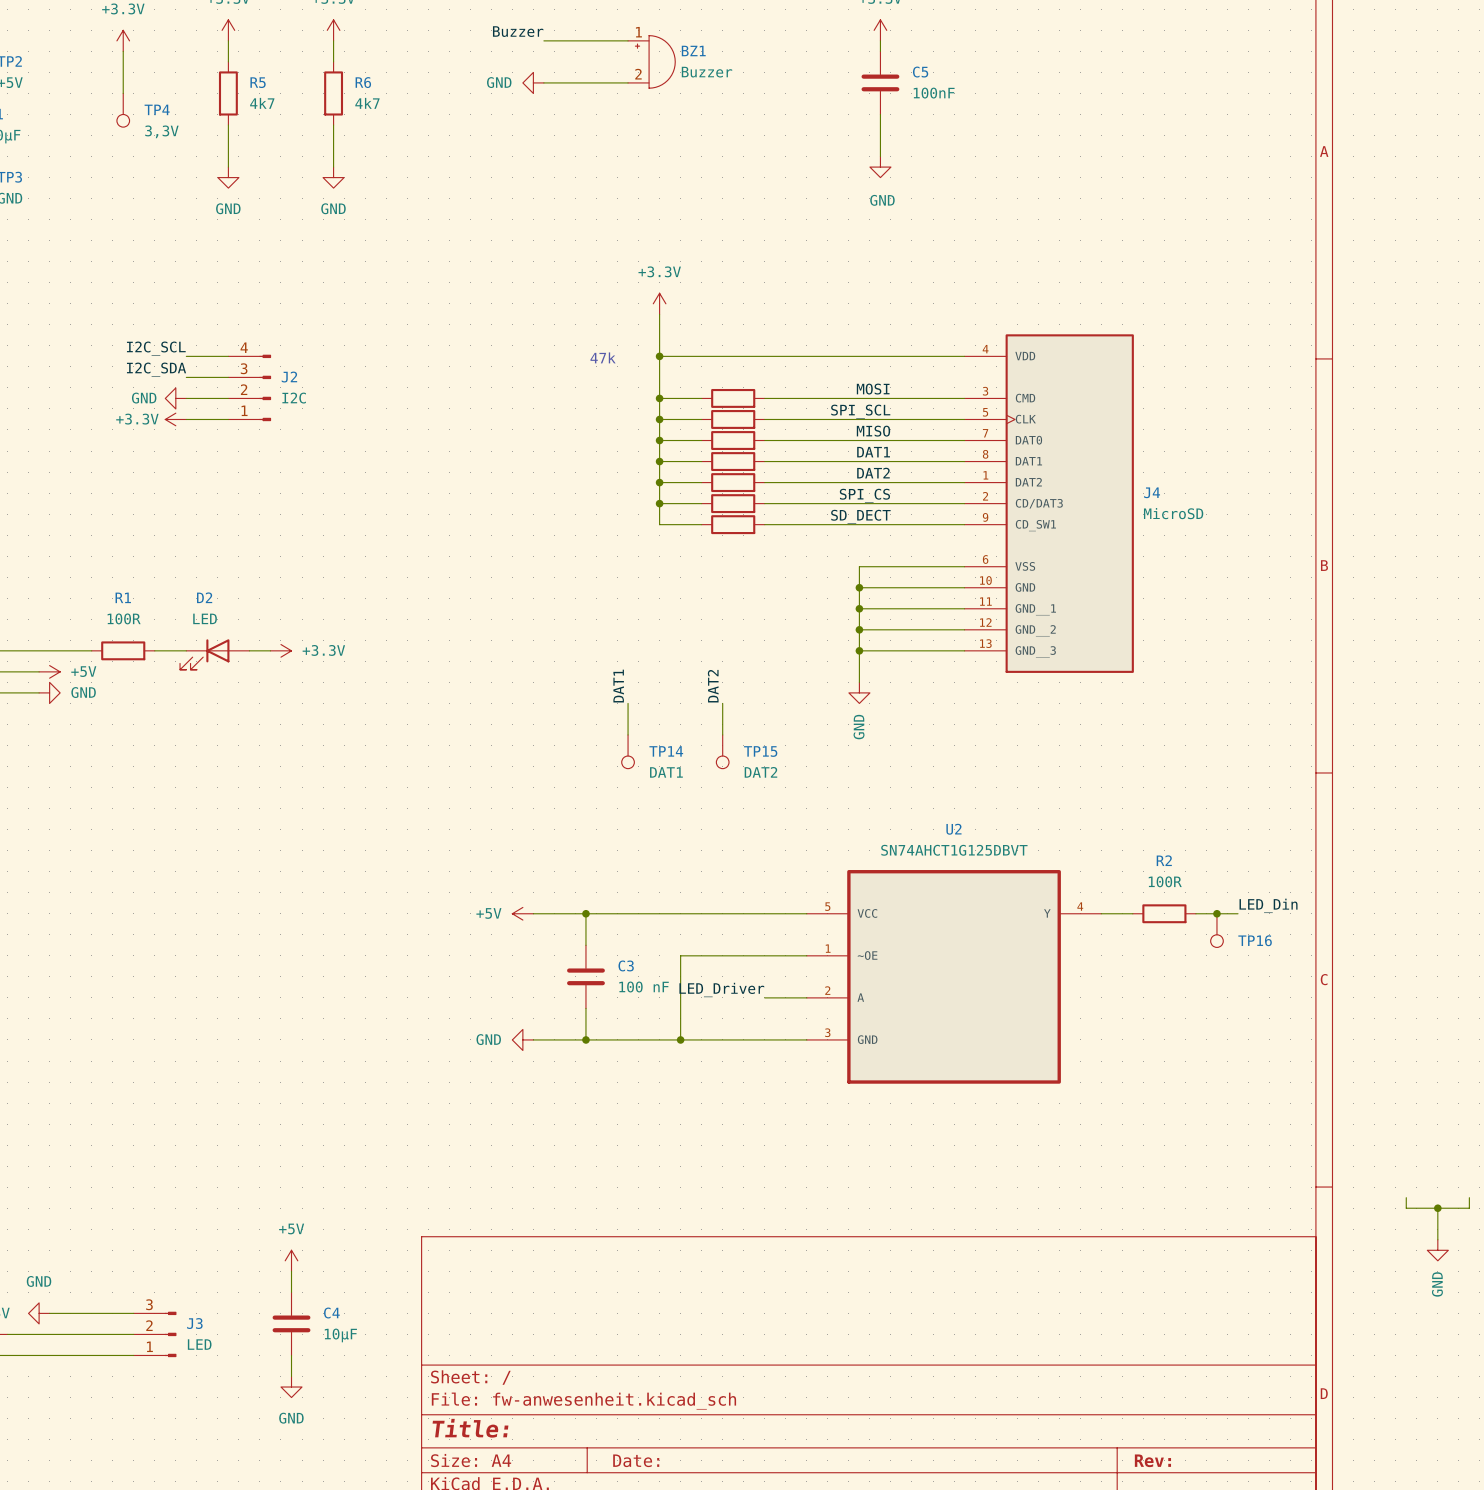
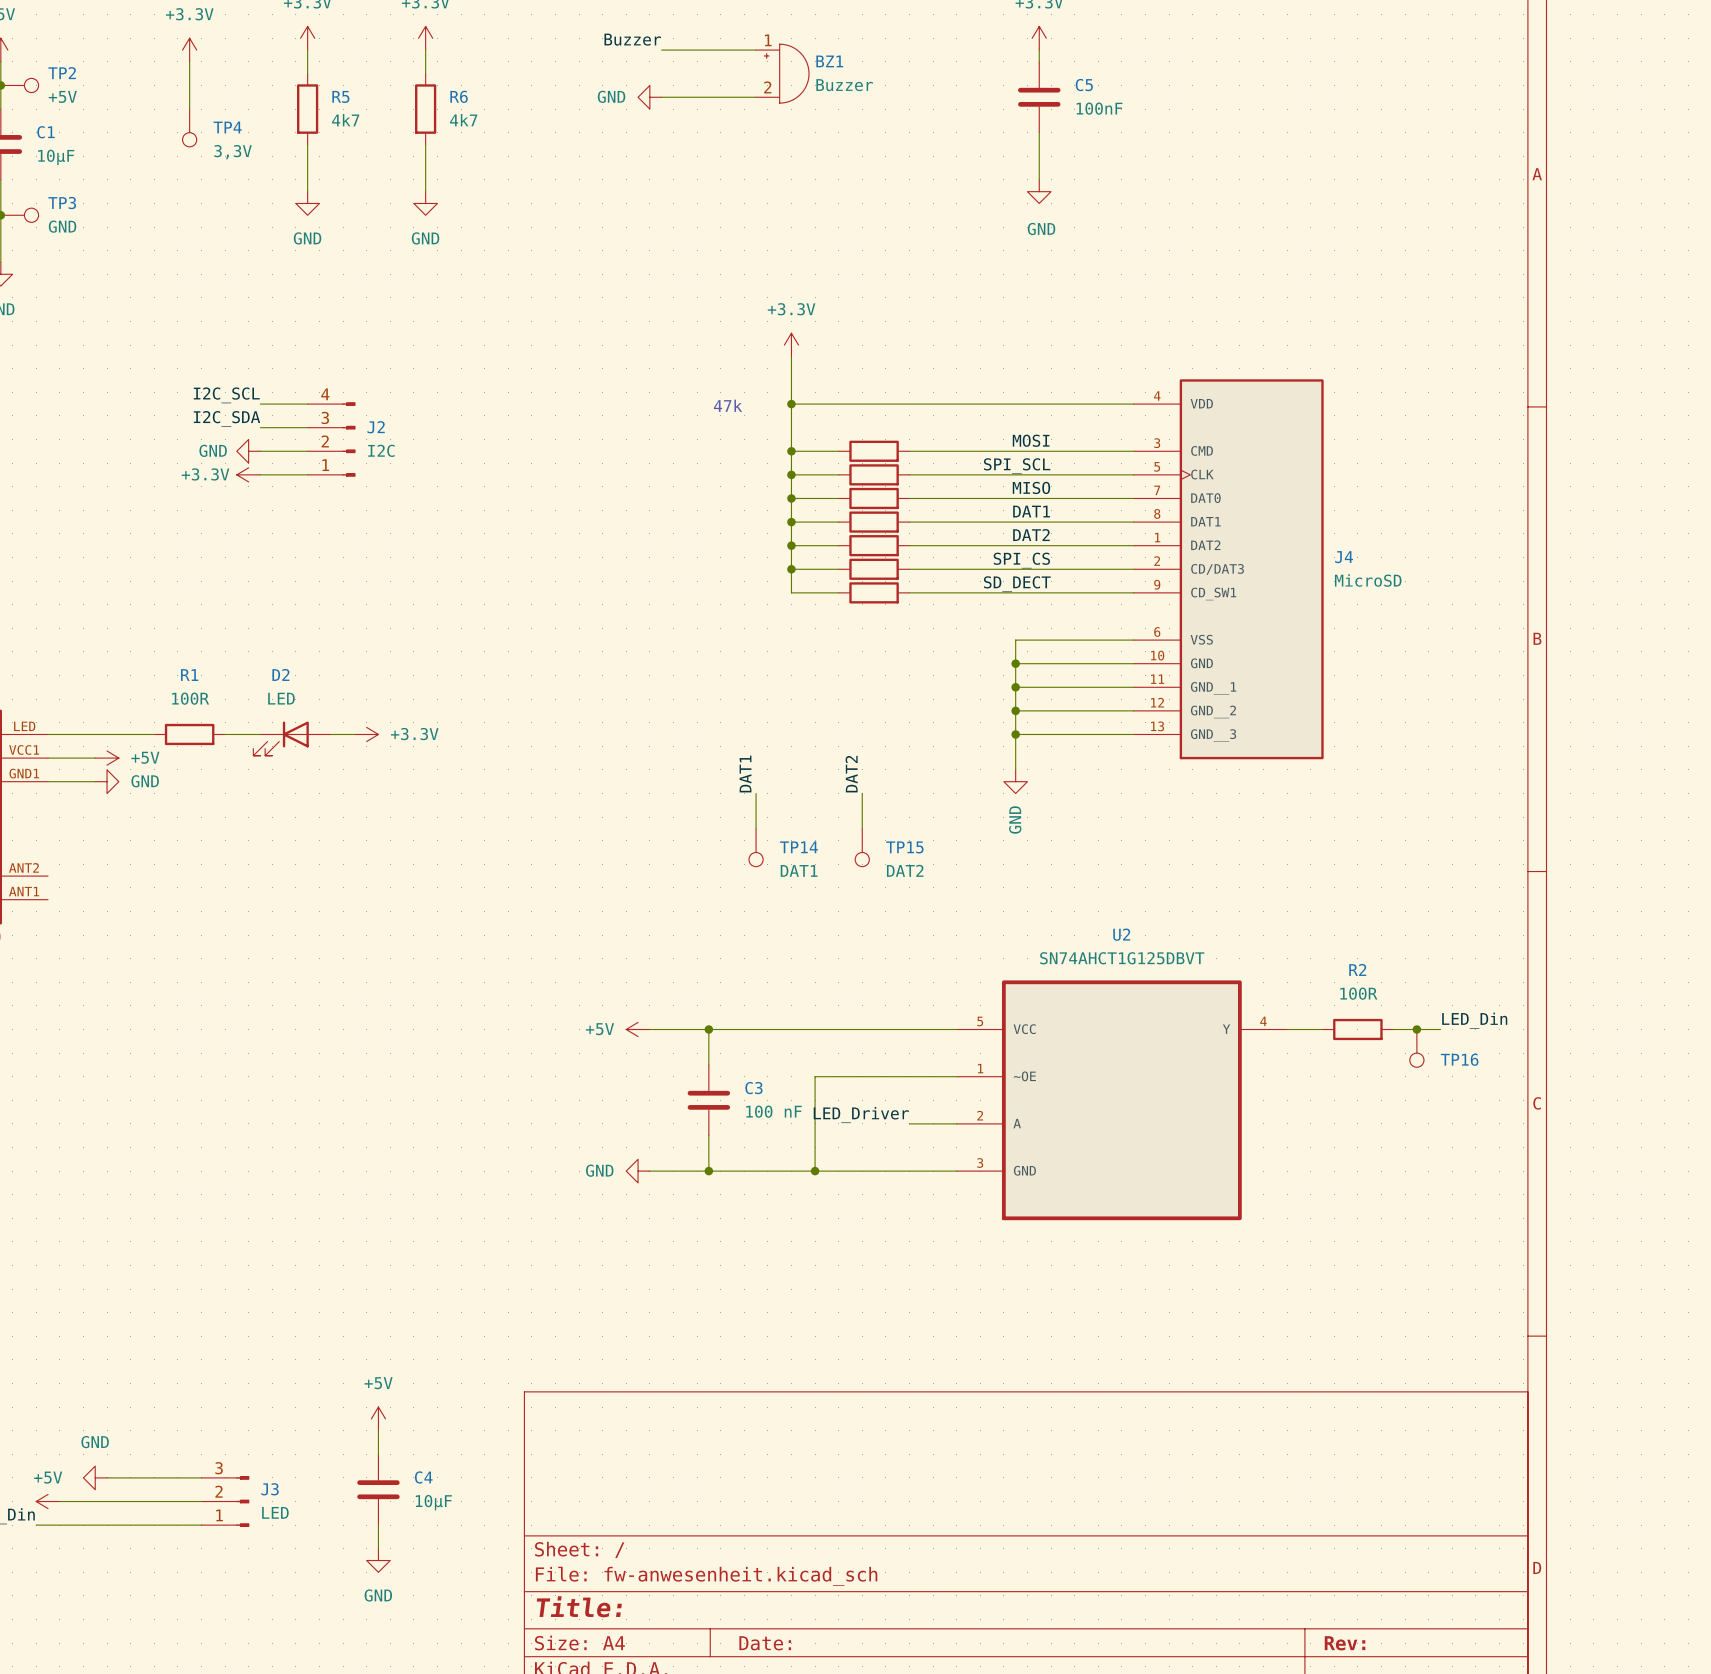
wire: (1406, 1197) (1406, 1208) (1469, 1208) (1469, 1197) -> none
wire: (1437, 1208) (1437, 1239) -> none
junction: (1437, 1208) -> none
power symbol: GND (1437, 1250) -> none

